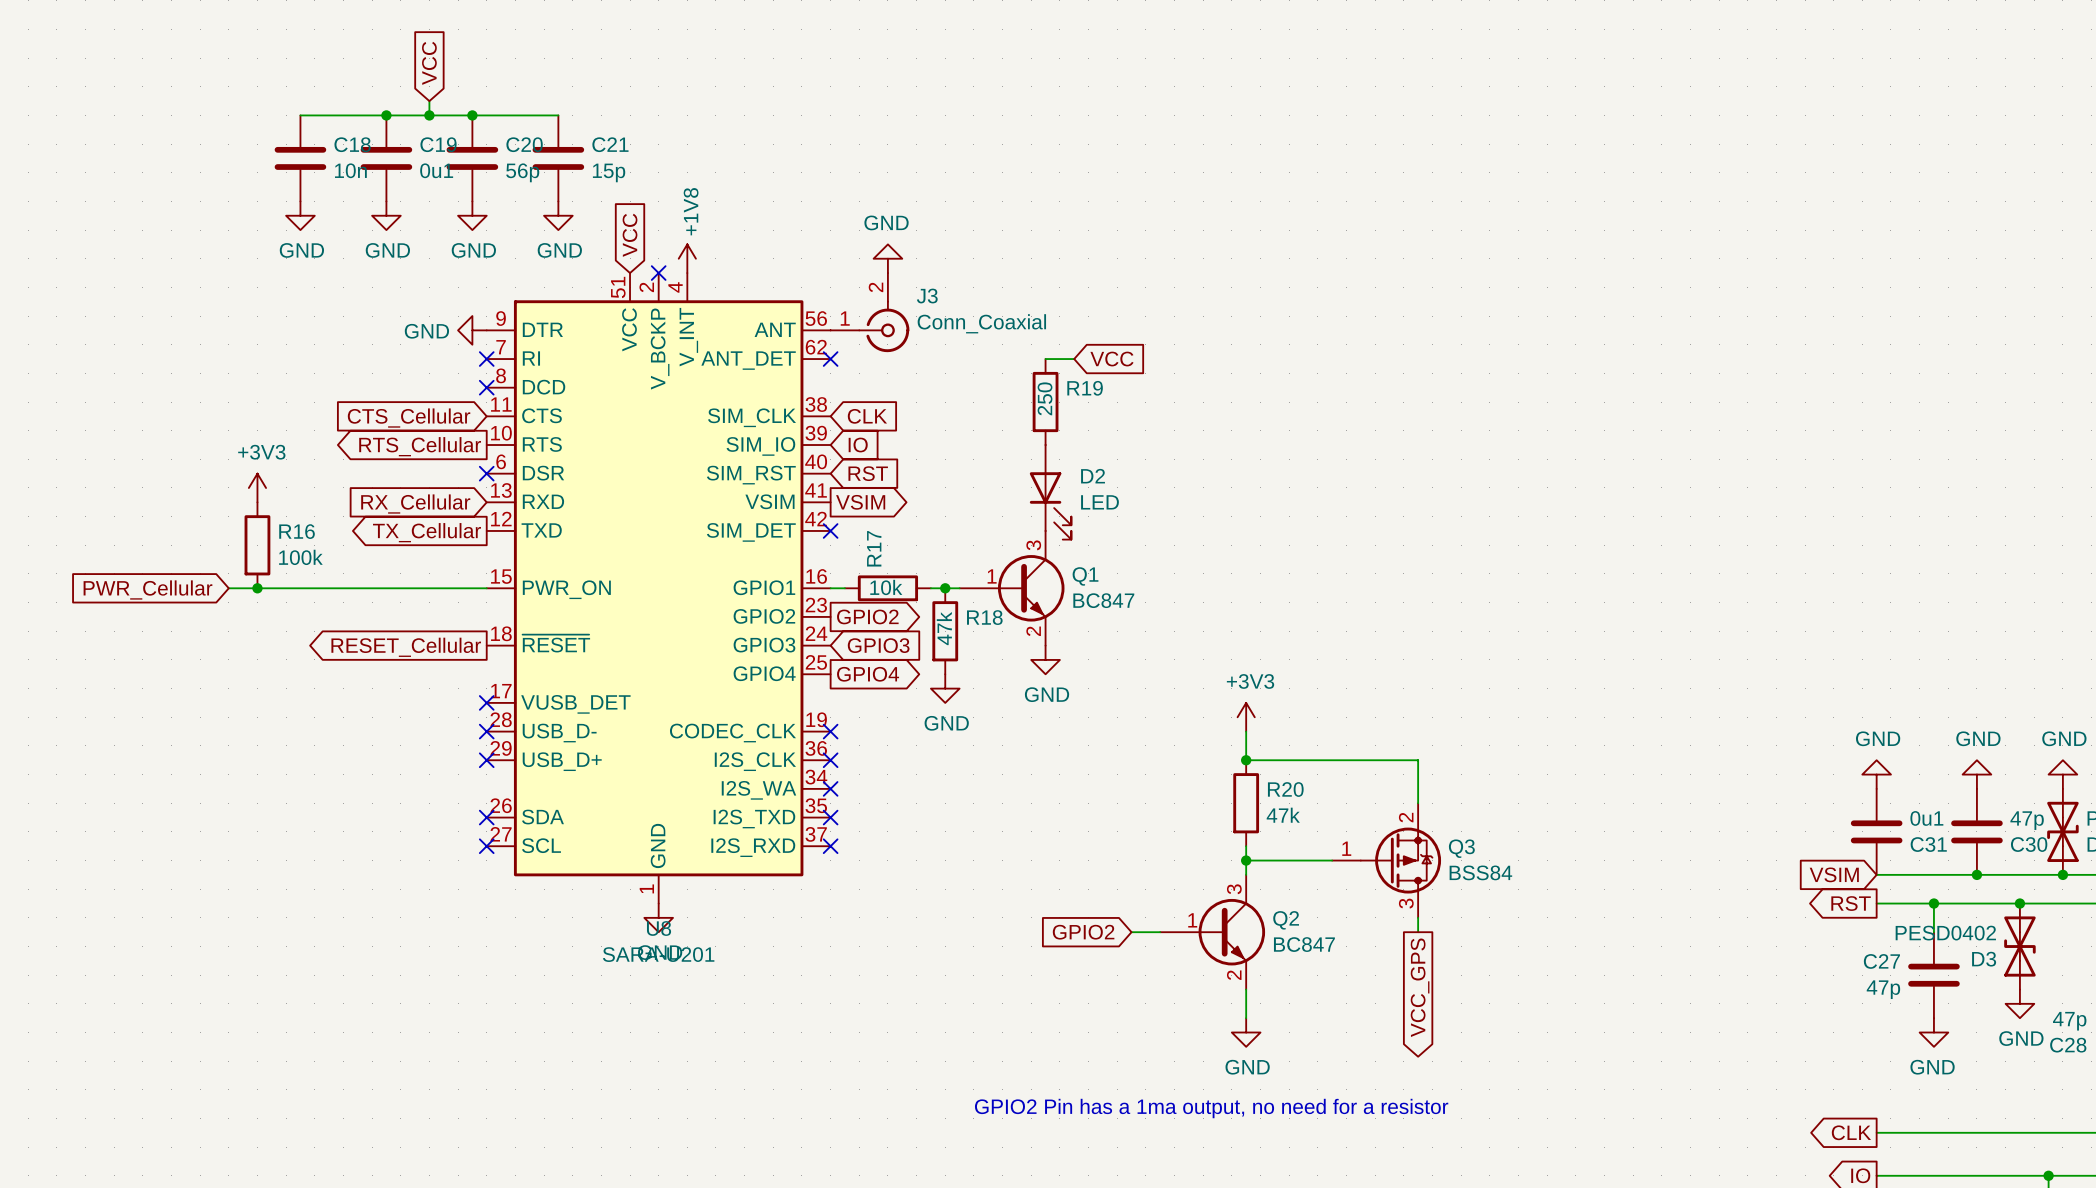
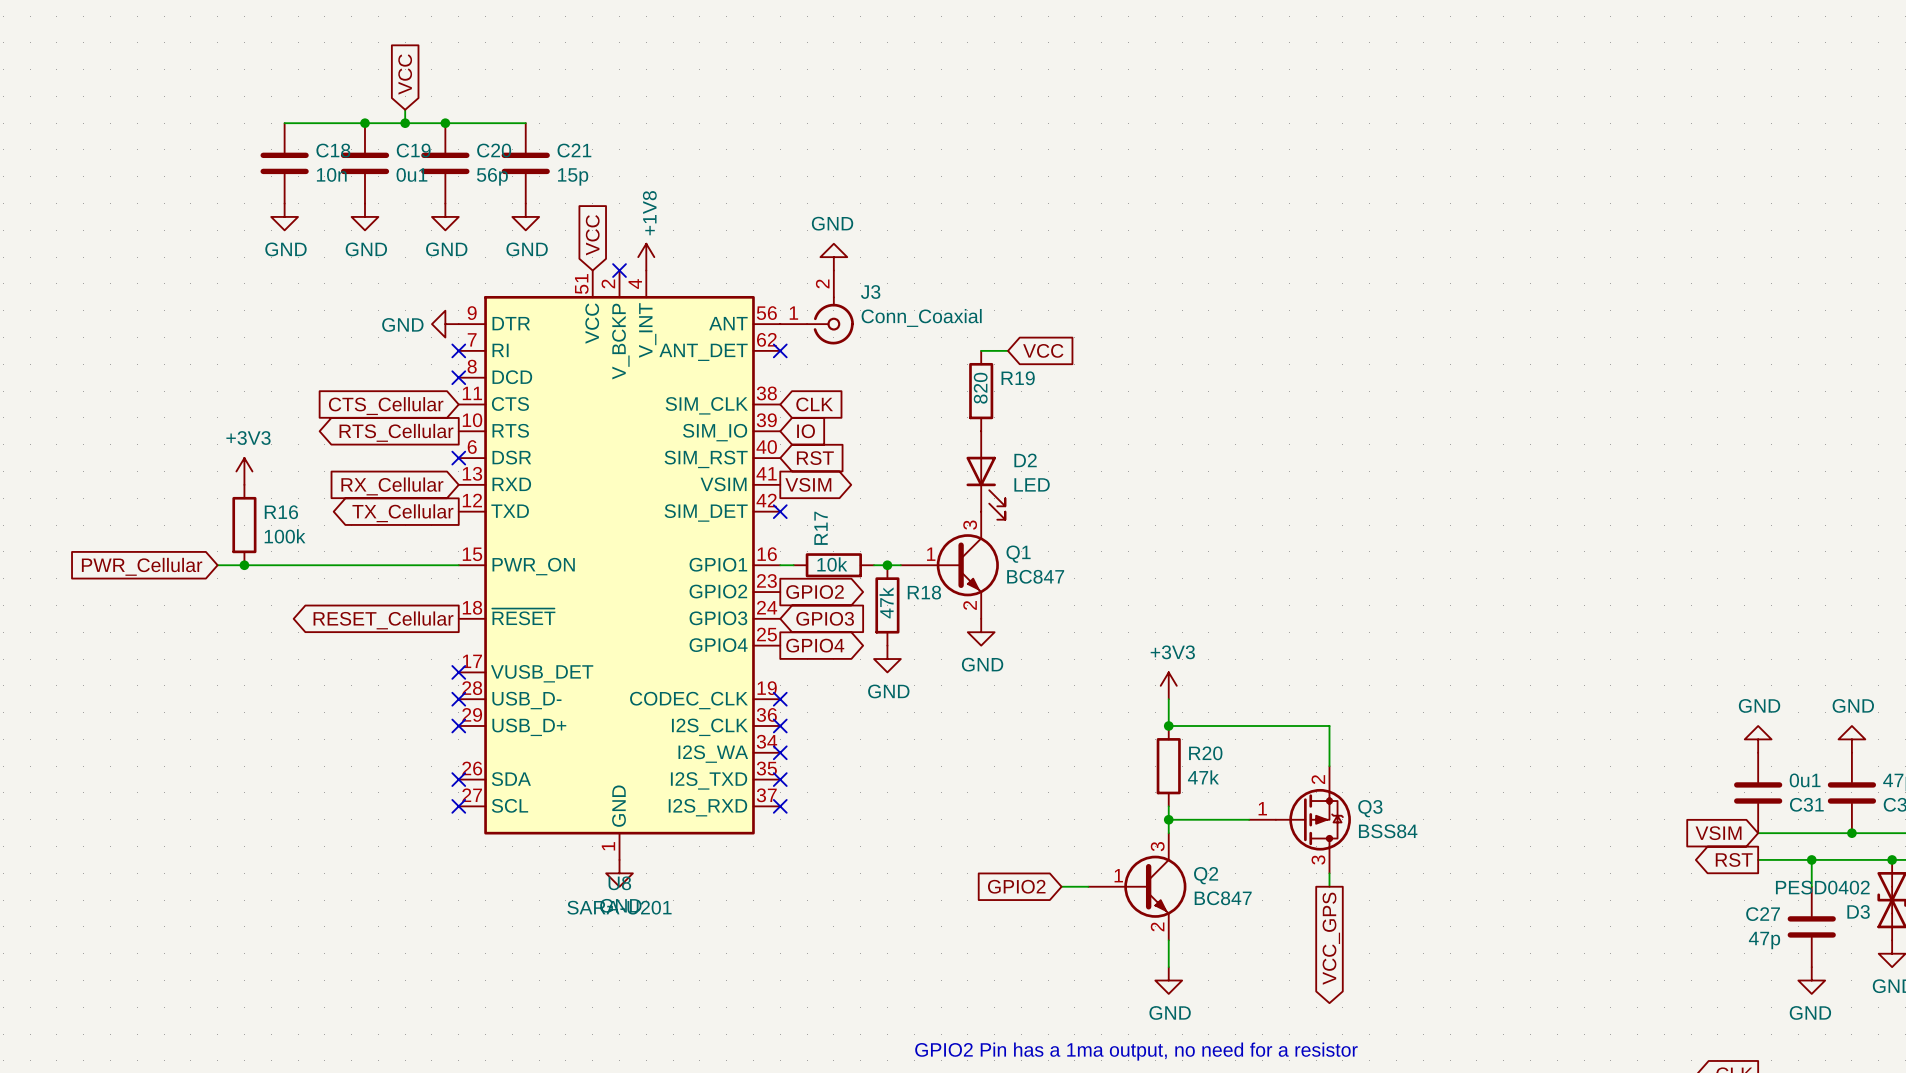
R19 value: 250 (1045, 398) -> 820 (980, 388)

